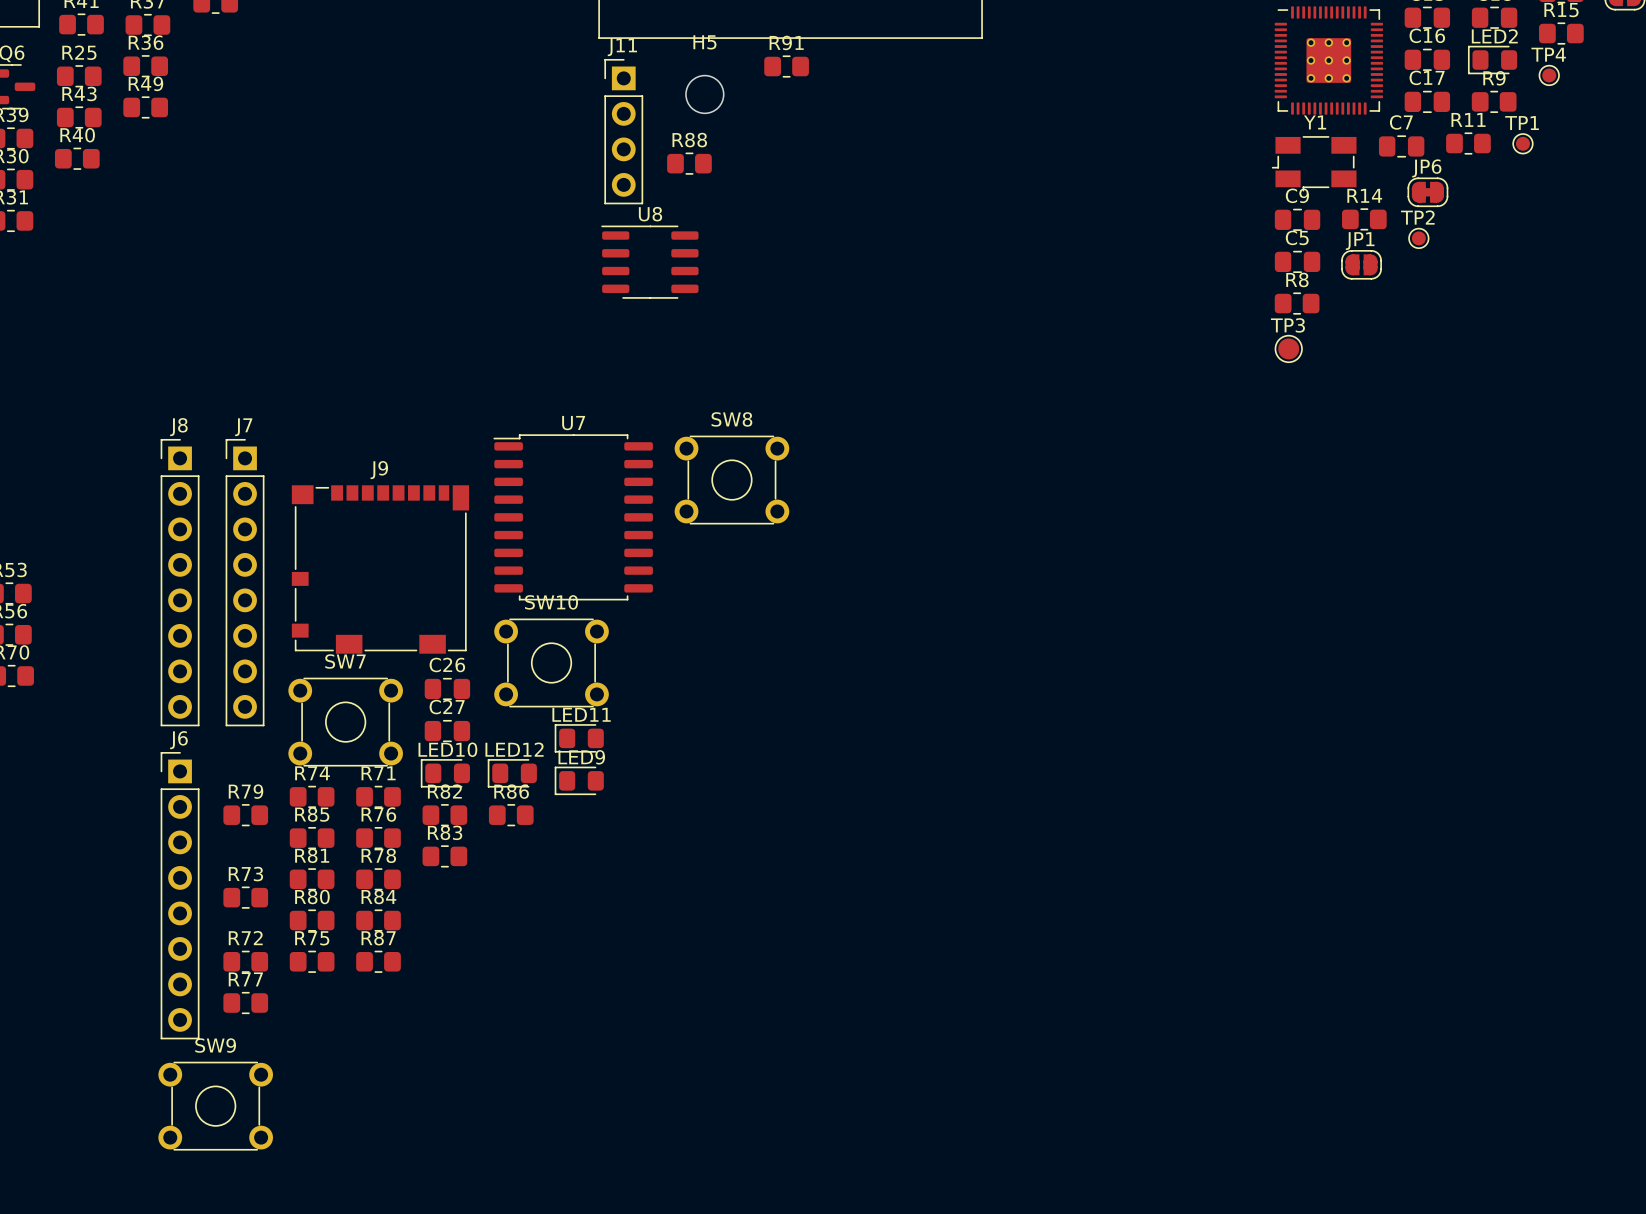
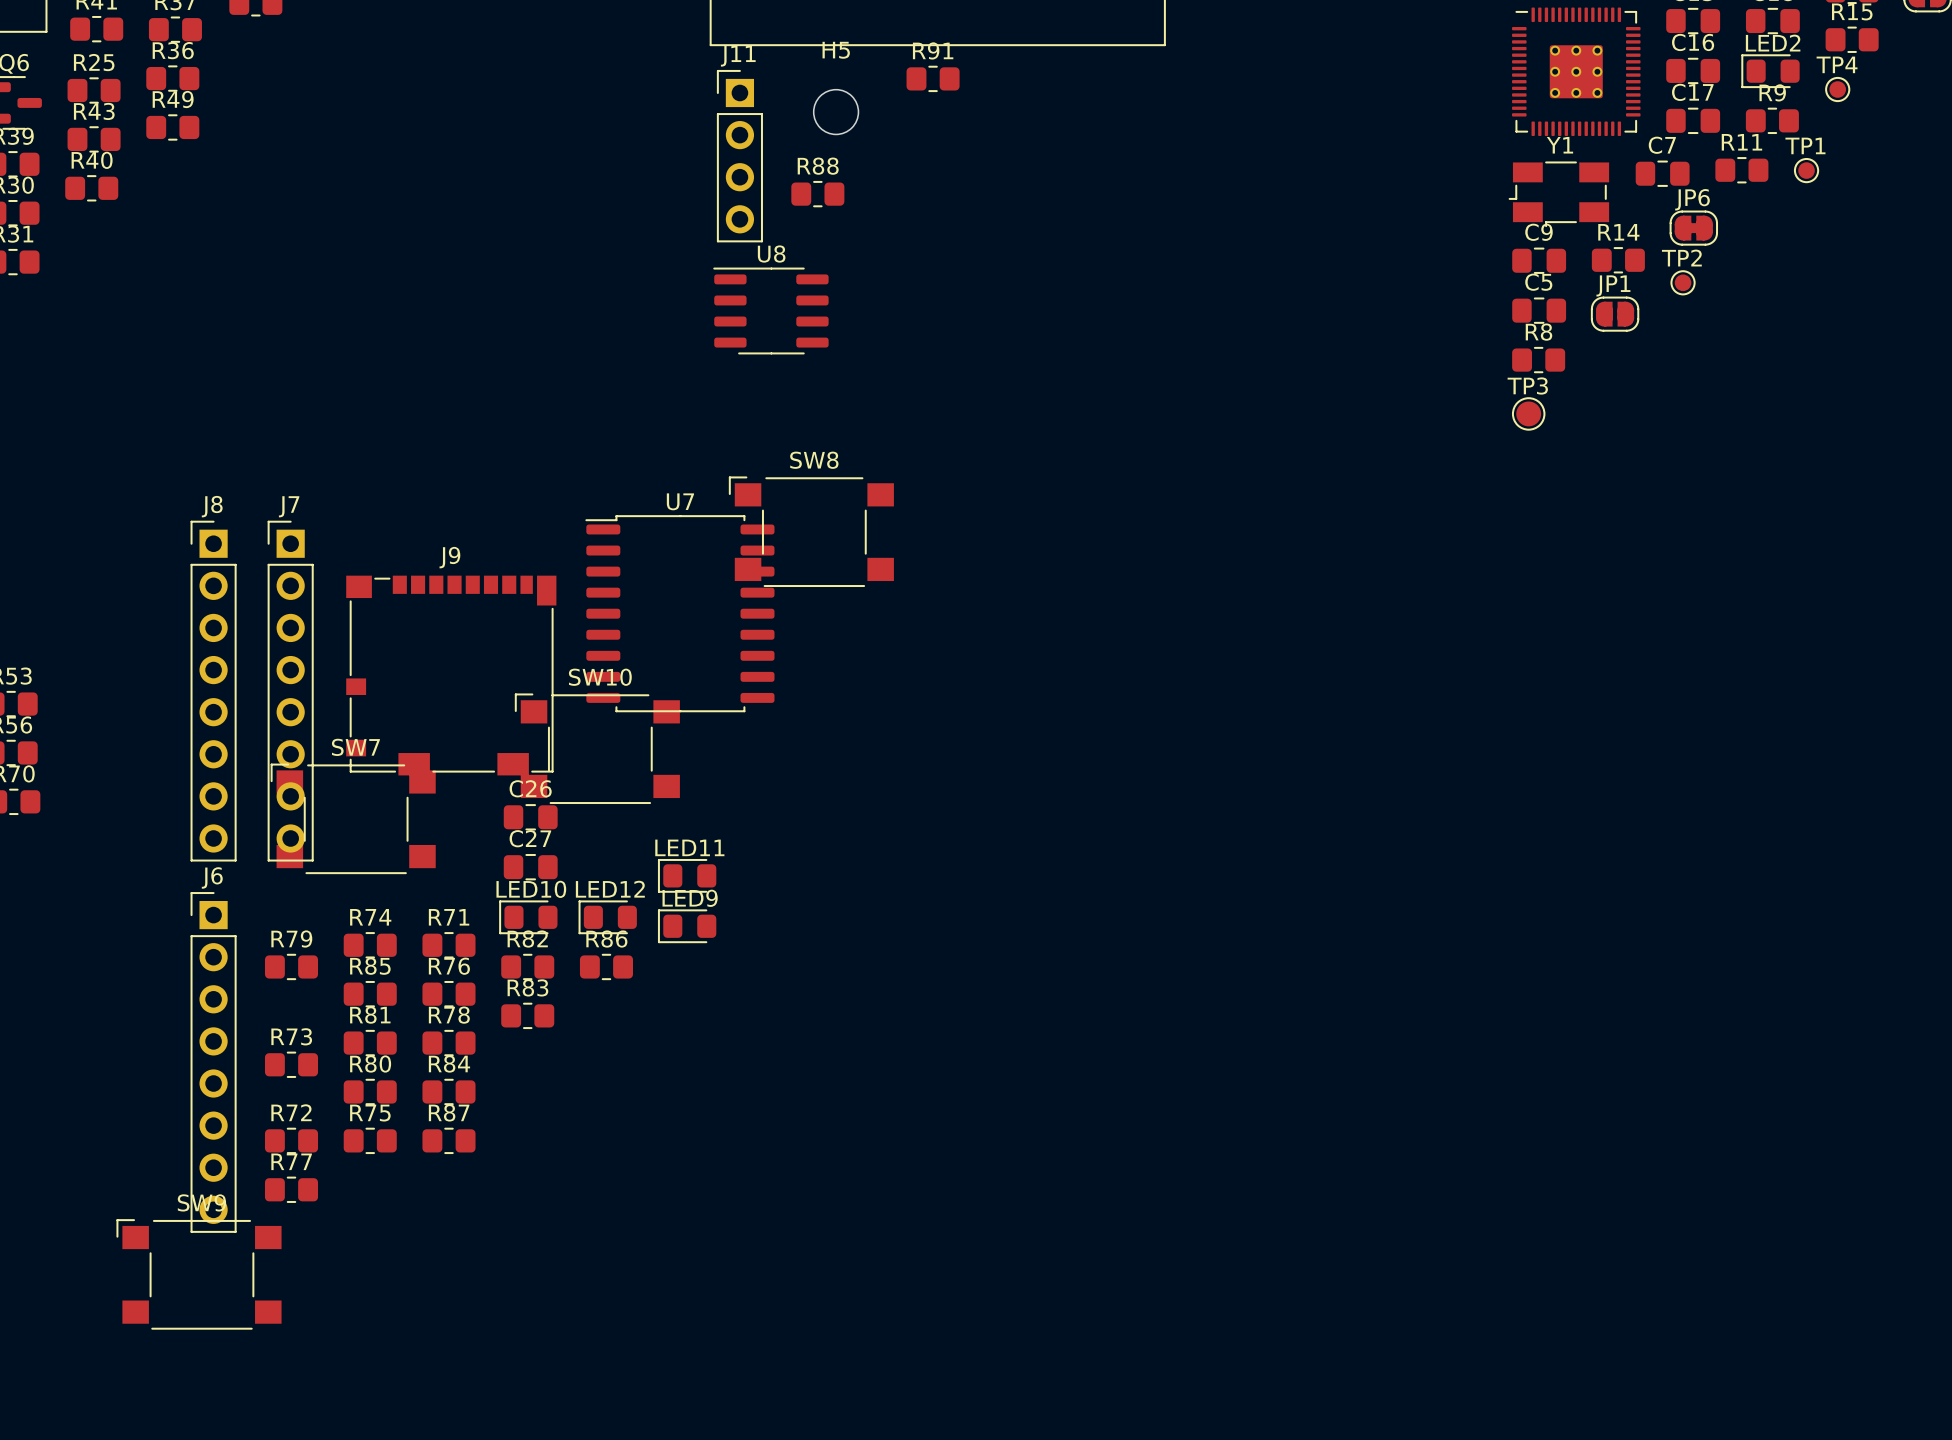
SW8 footprint: [674, 435, 790, 525] -> [728, 476, 894, 588]
SW10 footprint: [494, 618, 609, 708] -> [514, 693, 680, 805]
SW7 footprint: [288, 677, 403, 767] -> [270, 763, 436, 875]
SW9 footprint: [158, 1061, 273, 1151] -> [116, 1219, 282, 1330]

